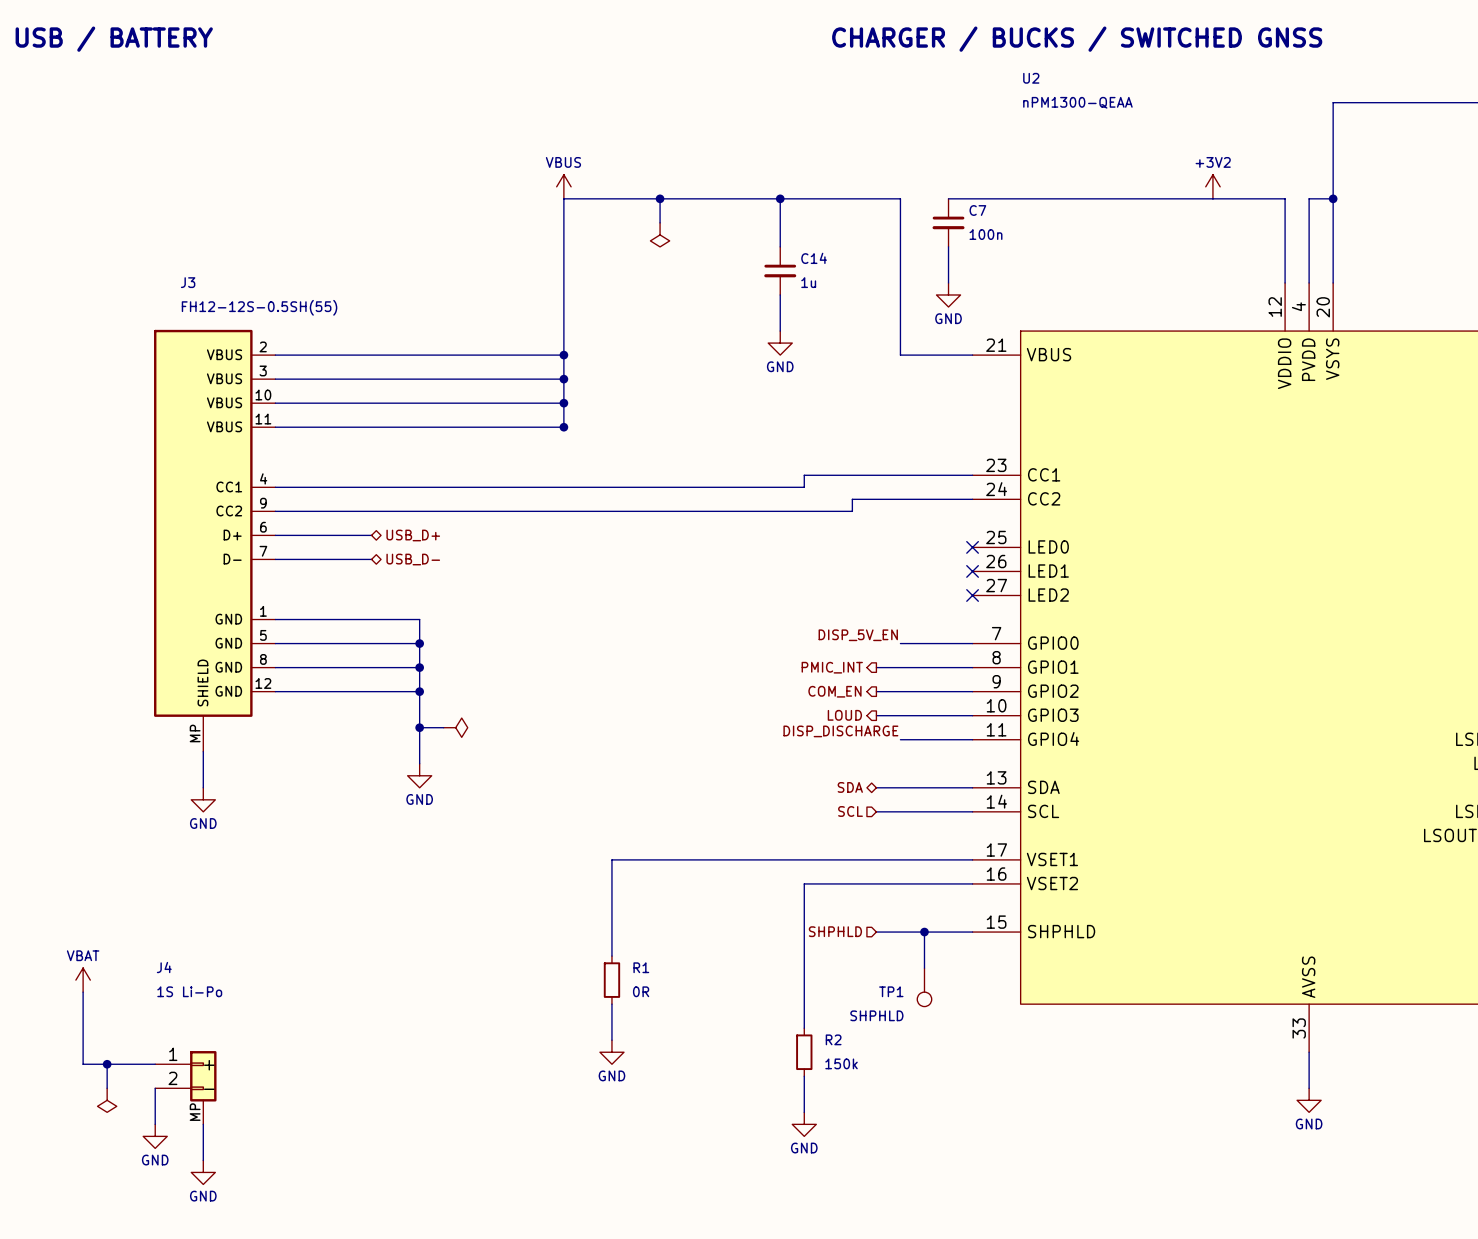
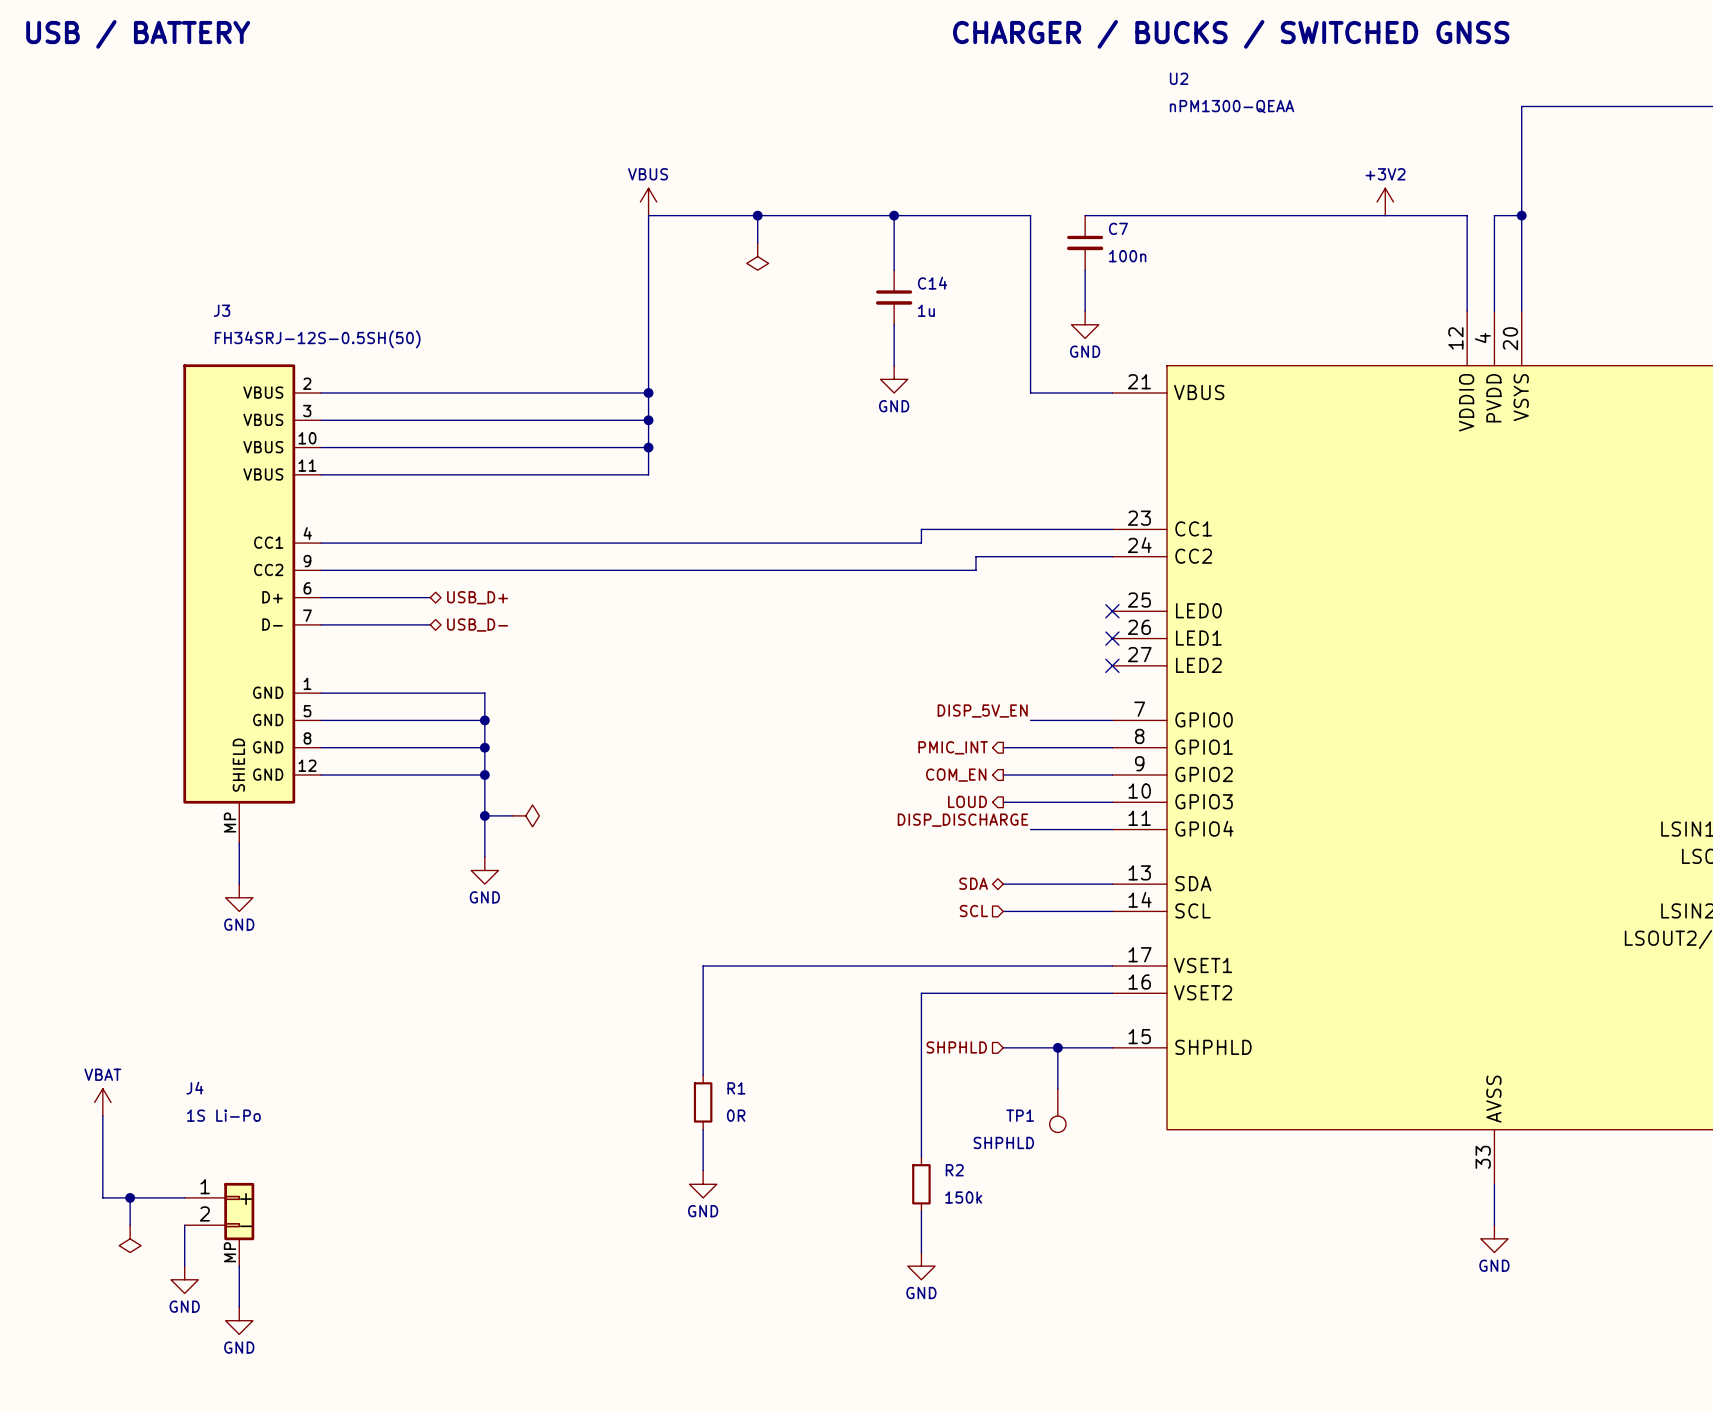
J3 value: FH12-12S-0.5SH(55) (259, 307) -> FH34SRJ-12S-0.5SH(50) (317, 339)
junction: (563, 427) -> none

